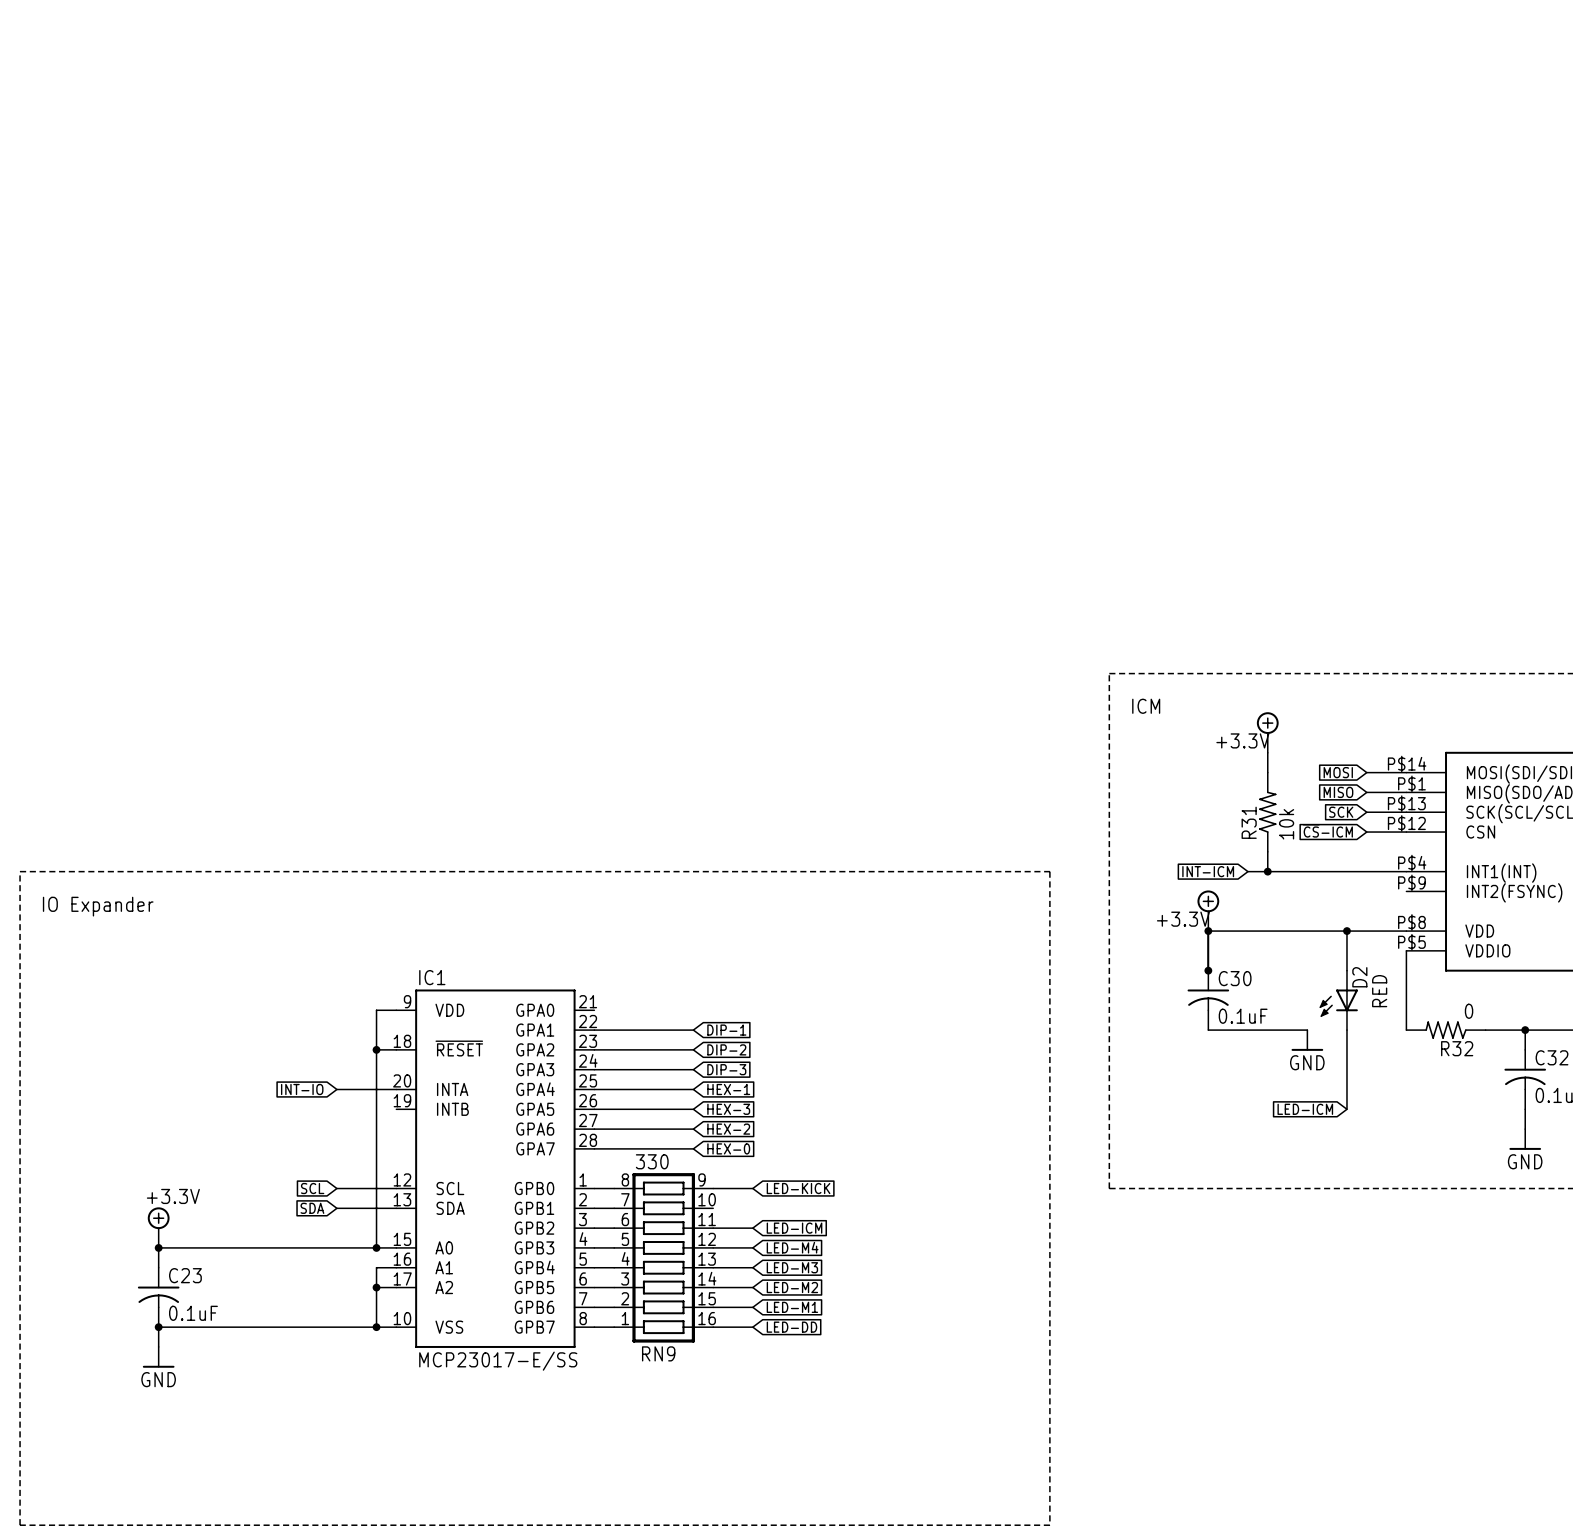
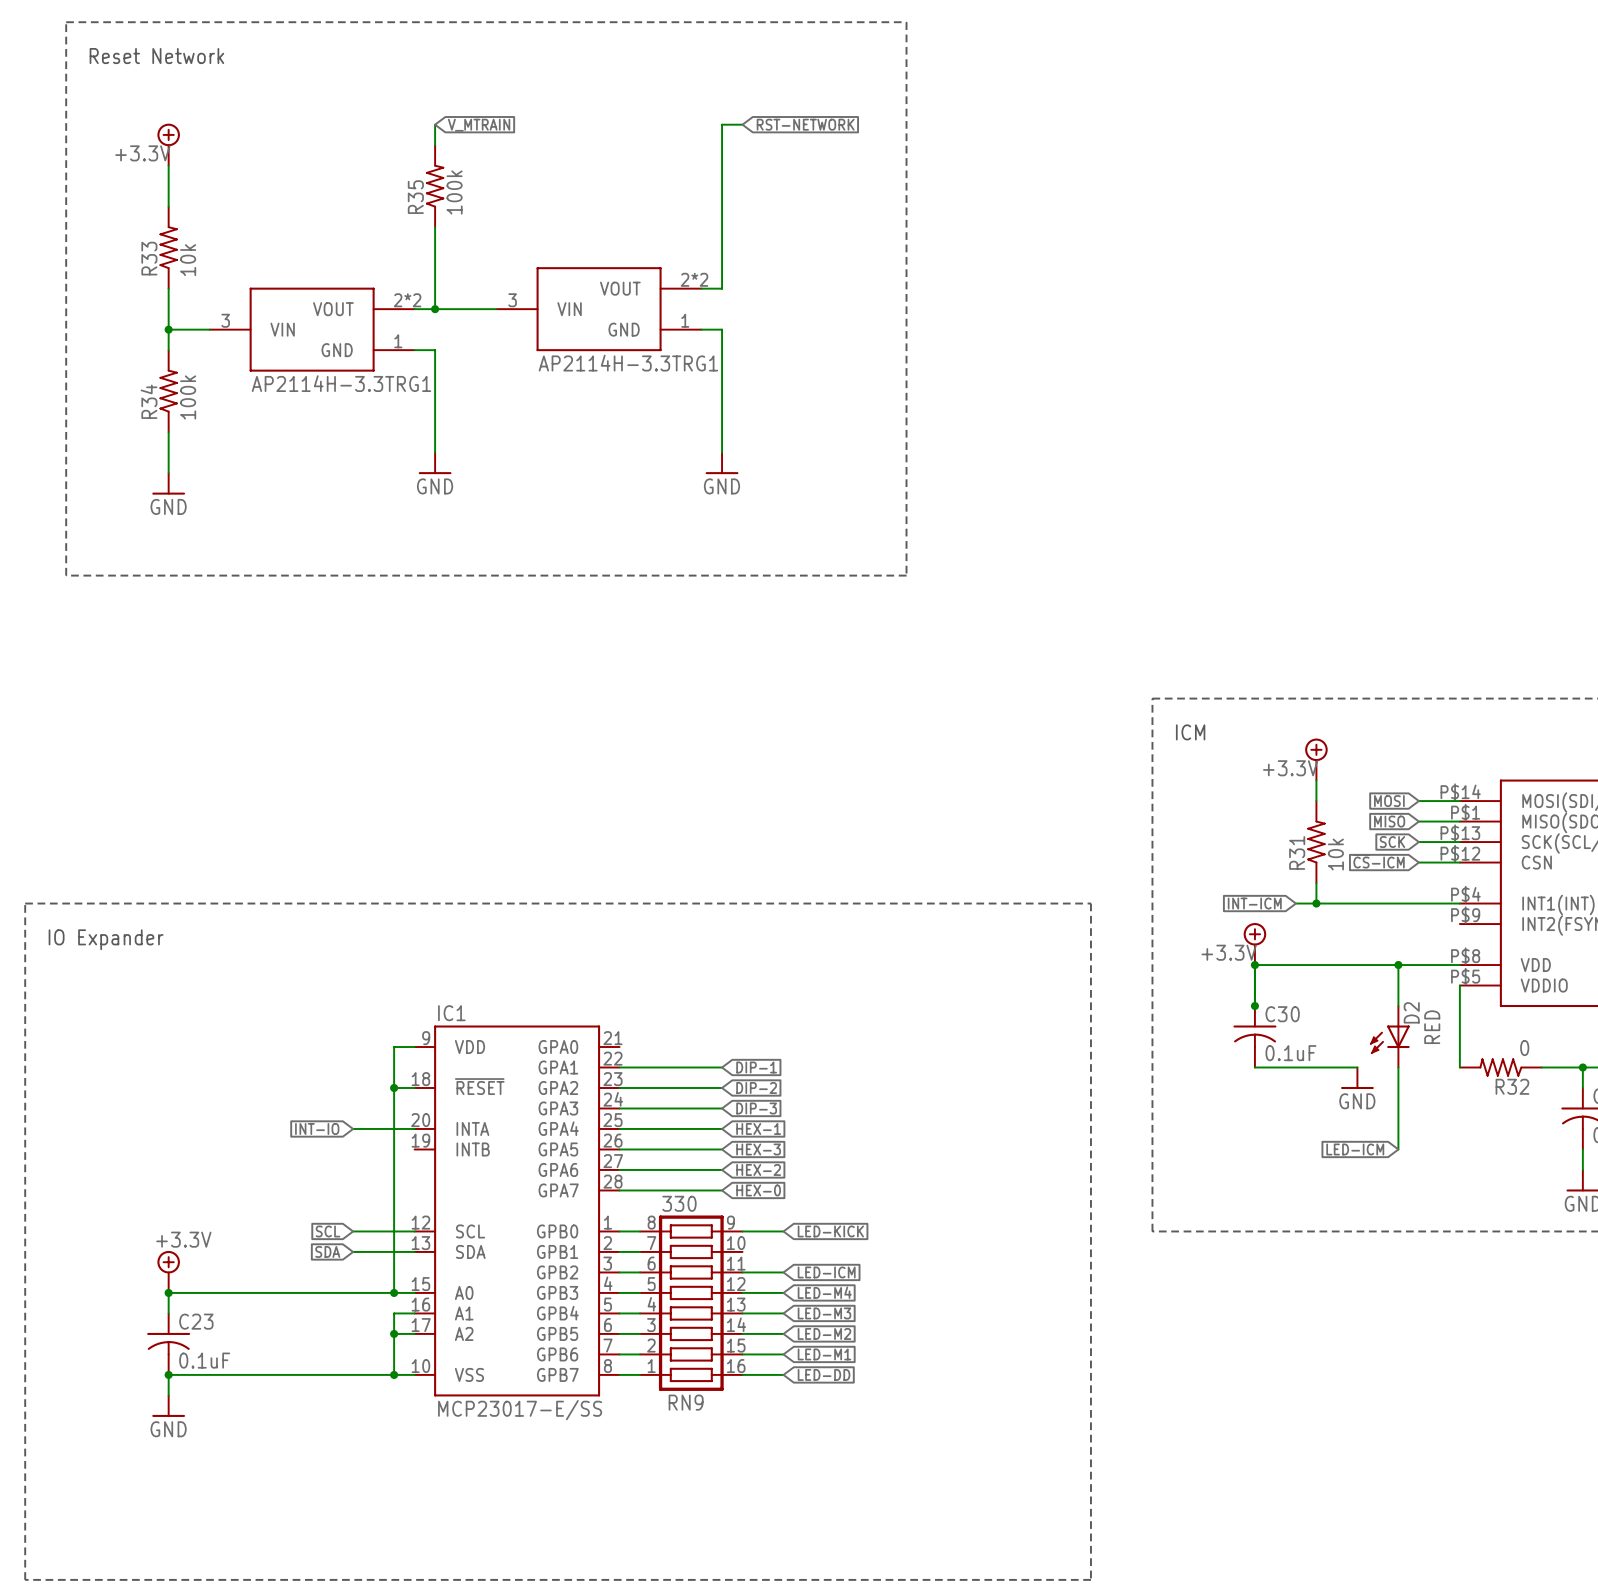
line: none -> (66, 22) (906, 22) (906, 575) (66, 575) (66, 22)
text: none -> Reset Network (156, 56)
wire: none -> (435, 124) (435, 145)
global label: none -> V_MTRAIN (479, 125)
wire: none -> (742, 124) (722, 124) (722, 288) (701, 288)
global label: none -> RST-NETWORK (805, 124)
power symbol: none -> +3.3V (168, 144)
wire: none -> (168, 165) (168, 206)
R35: none -> 100k (435, 186)
wire: none -> (435, 227) (435, 309)
R33: none -> 10k (168, 247)
wire: none -> (168, 288) (168, 350)
wire: none -> (414, 309) (496, 309)
junction: none -> (435, 309)
part: none -> AP2114H-3.3TRG1 (599, 309)
wire: none -> (168, 329) (209, 329)
junction: none -> (168, 329)
part: none -> AP2114H-3.3TRG1 (312, 329)
wire: none -> (701, 329) (722, 329) (722, 452)
wire: none -> (414, 350) (435, 350) (435, 452)
R34: none -> 100k (168, 391)
wire: none -> (168, 432) (168, 473)
power symbol: none -> GND (435, 463)
power symbol: none -> GND (722, 463)
power symbol: none -> GND (168, 483)

